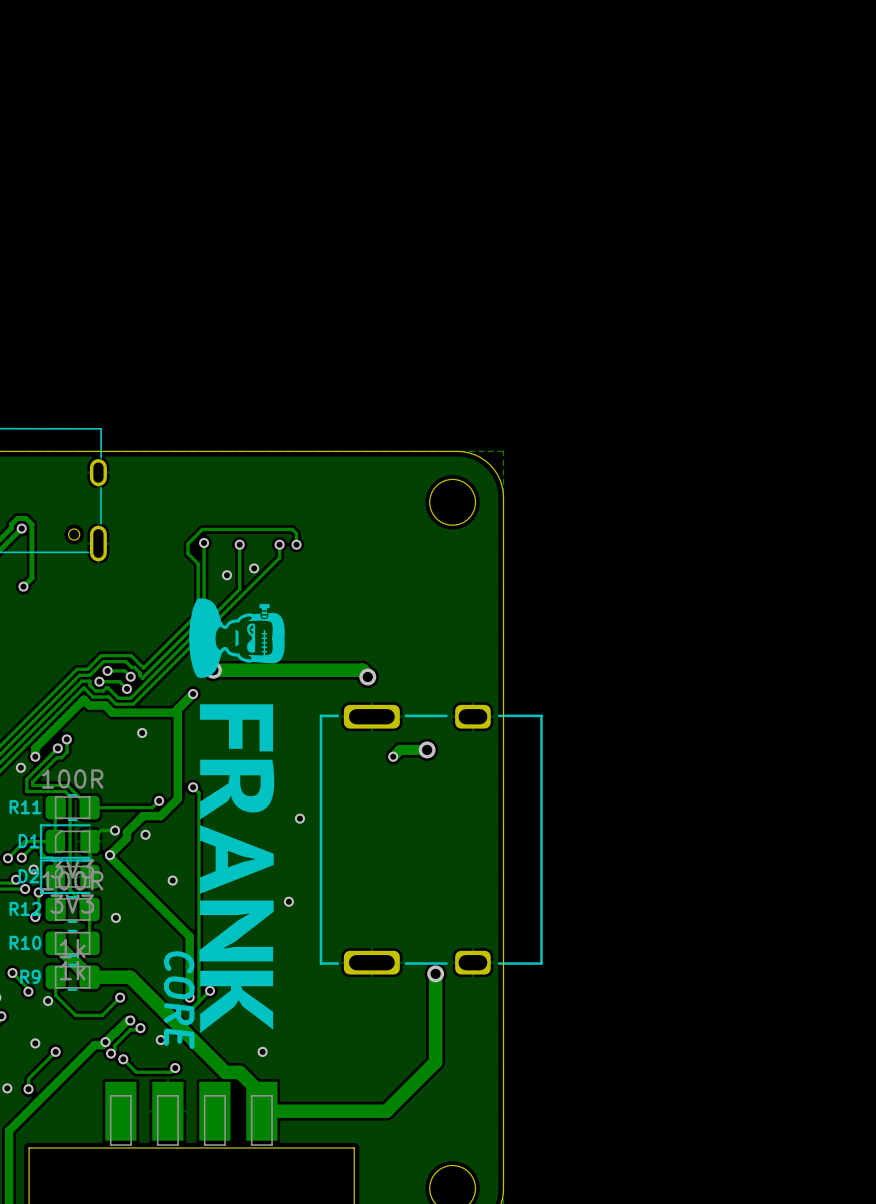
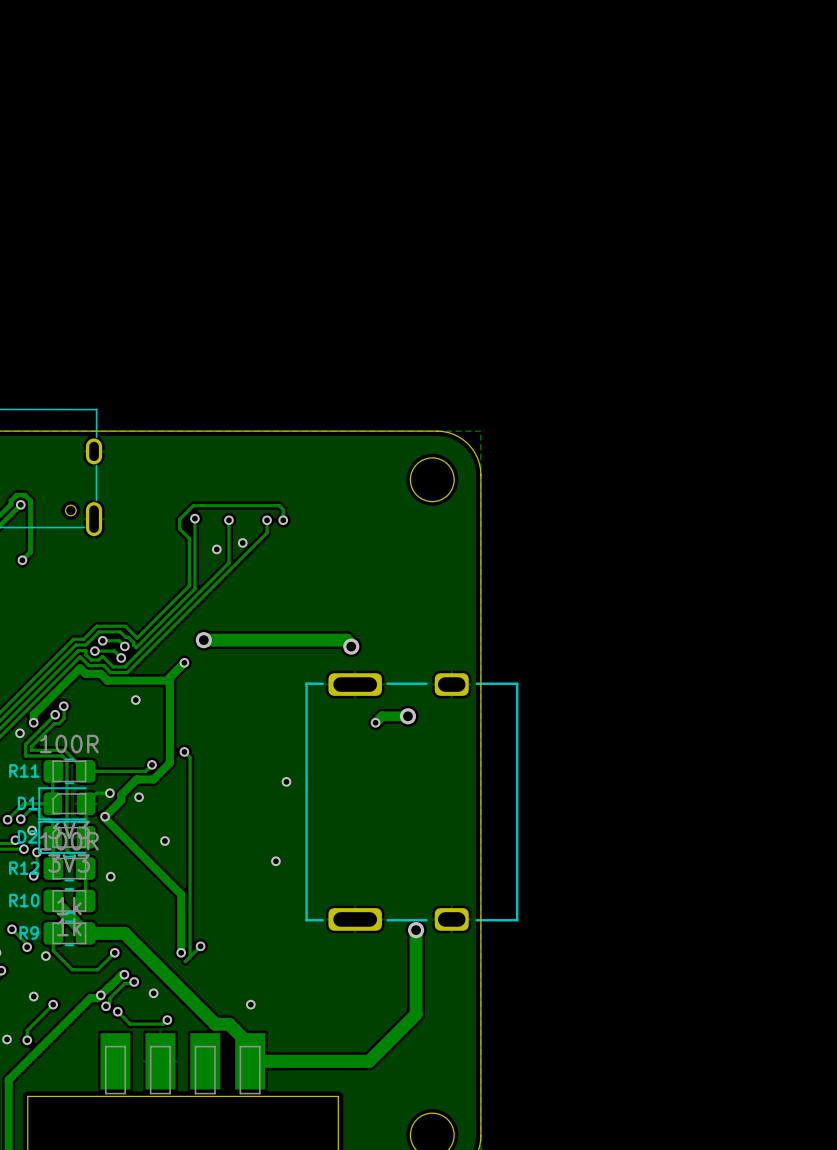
drawing: [189, 598, 285, 678] -> none
drawing: [199, 704, 275, 1034] -> none
text: CORE (179, 1000) -> none

